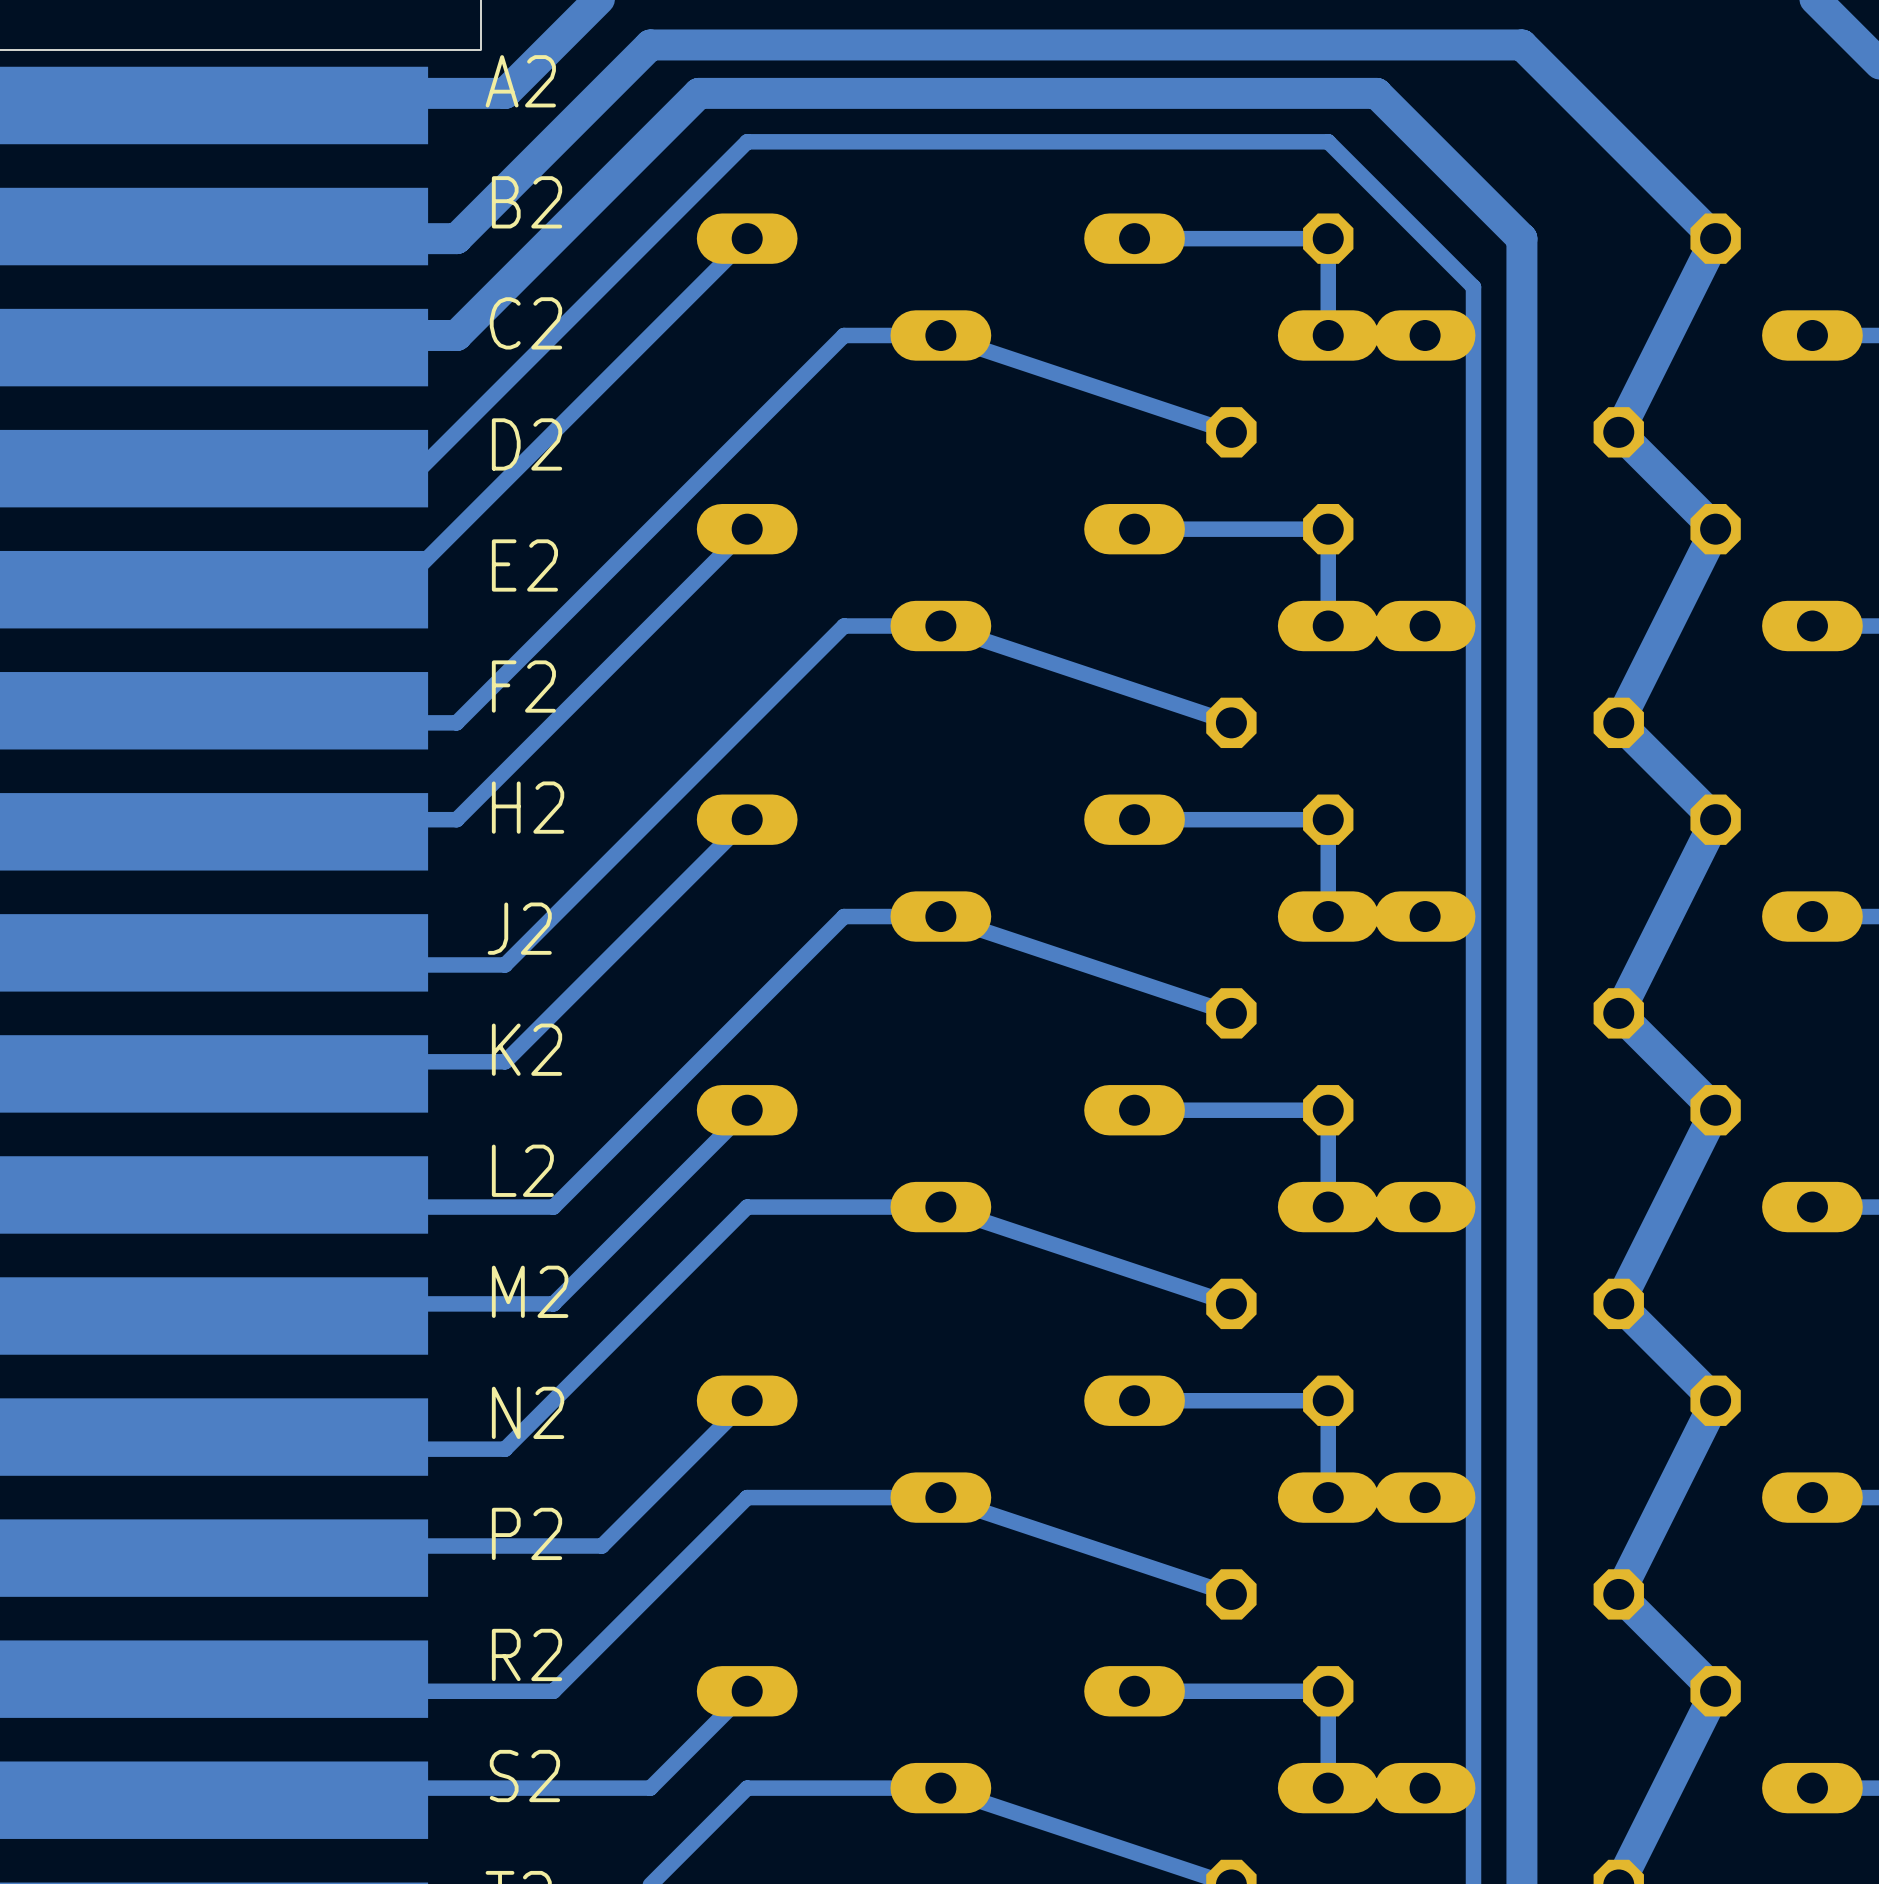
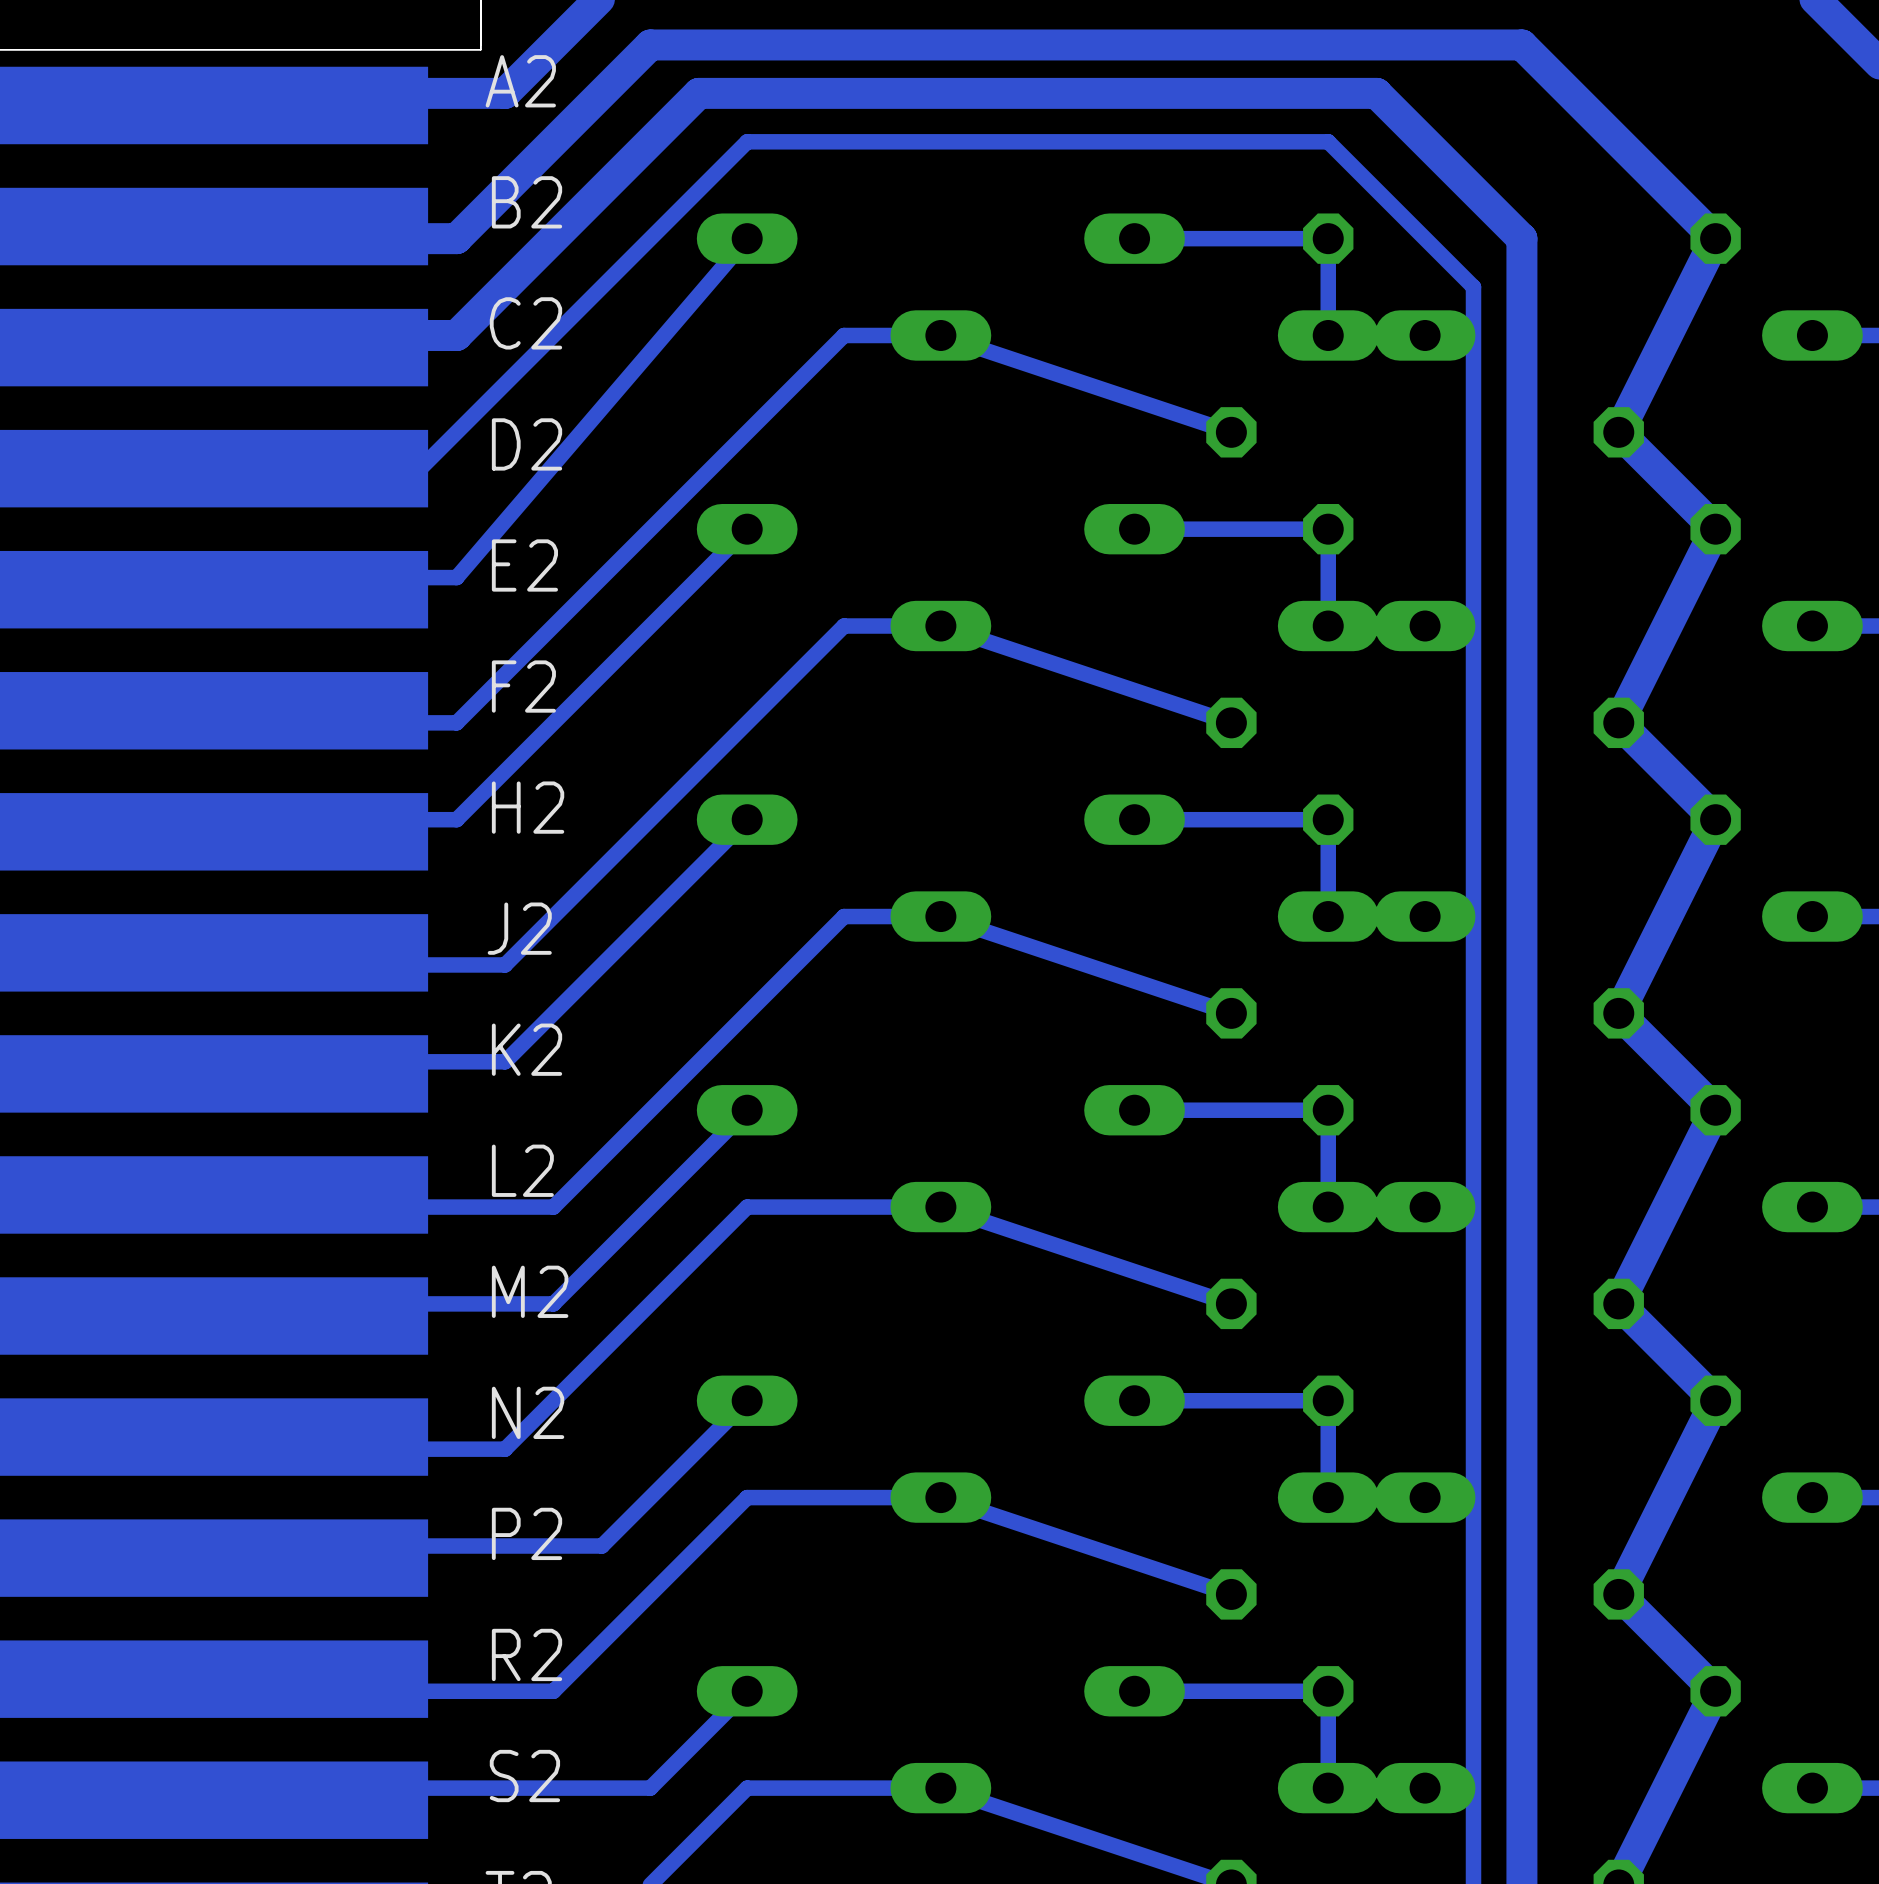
bottom track: (747, 238) (408, 577) -> (747, 238) (456, 577) (408, 577)

